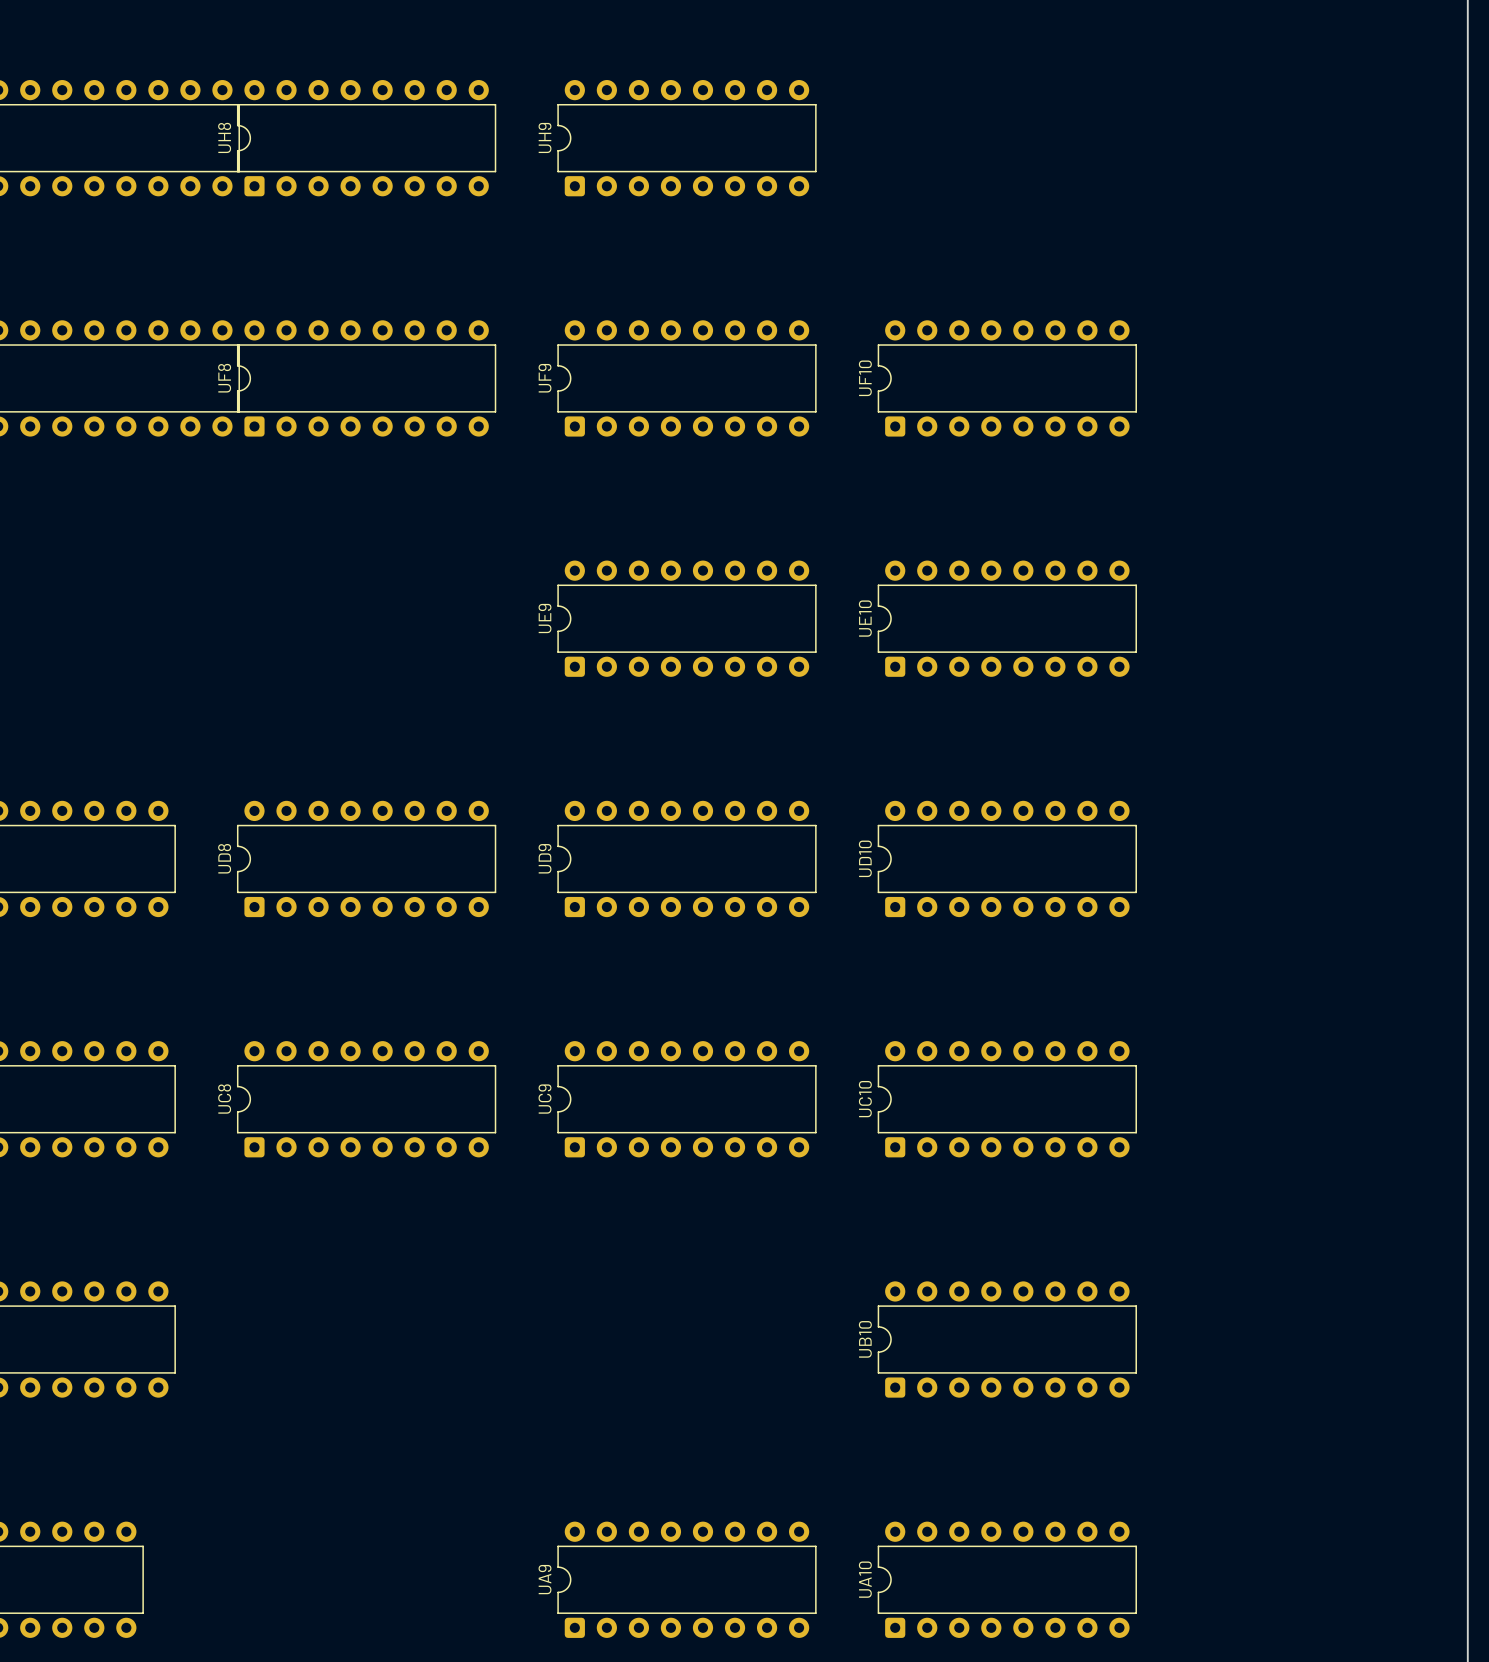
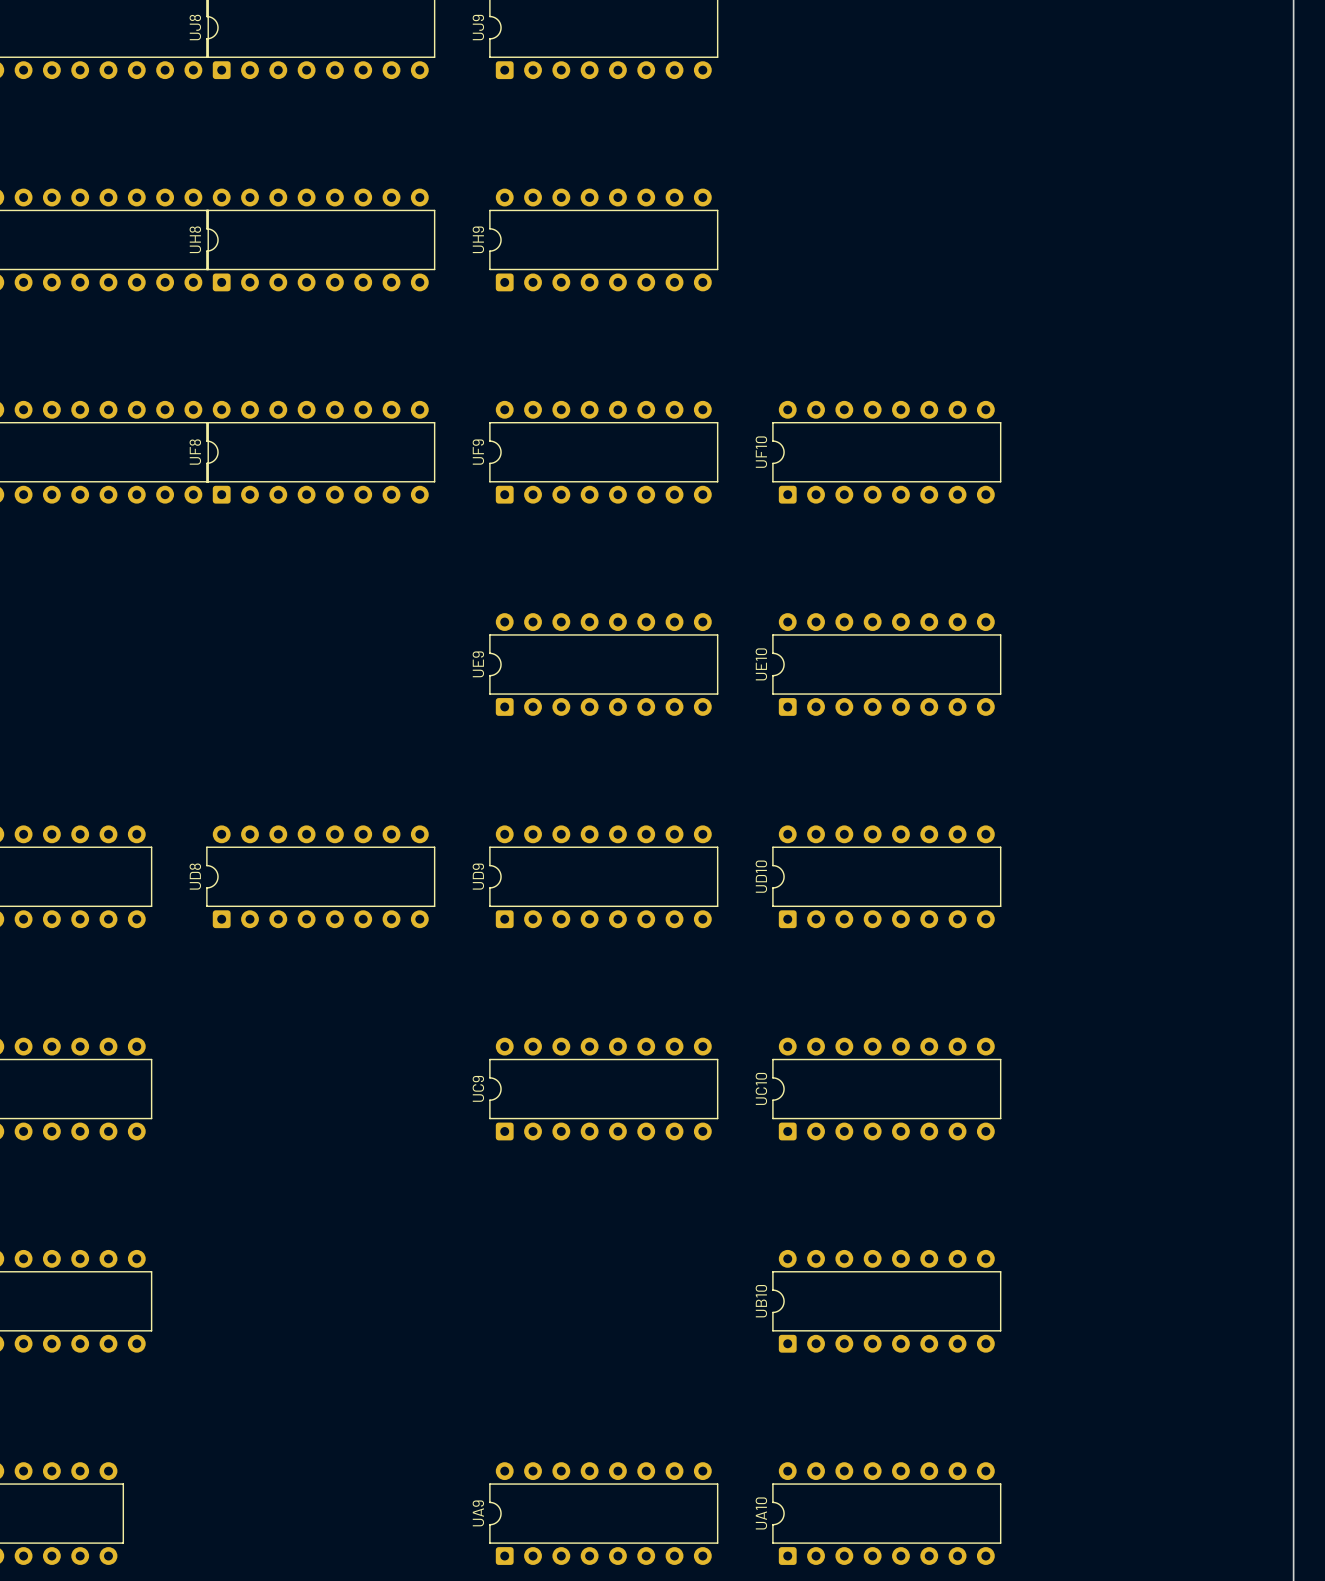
UC8: (366, 1099) -> none

